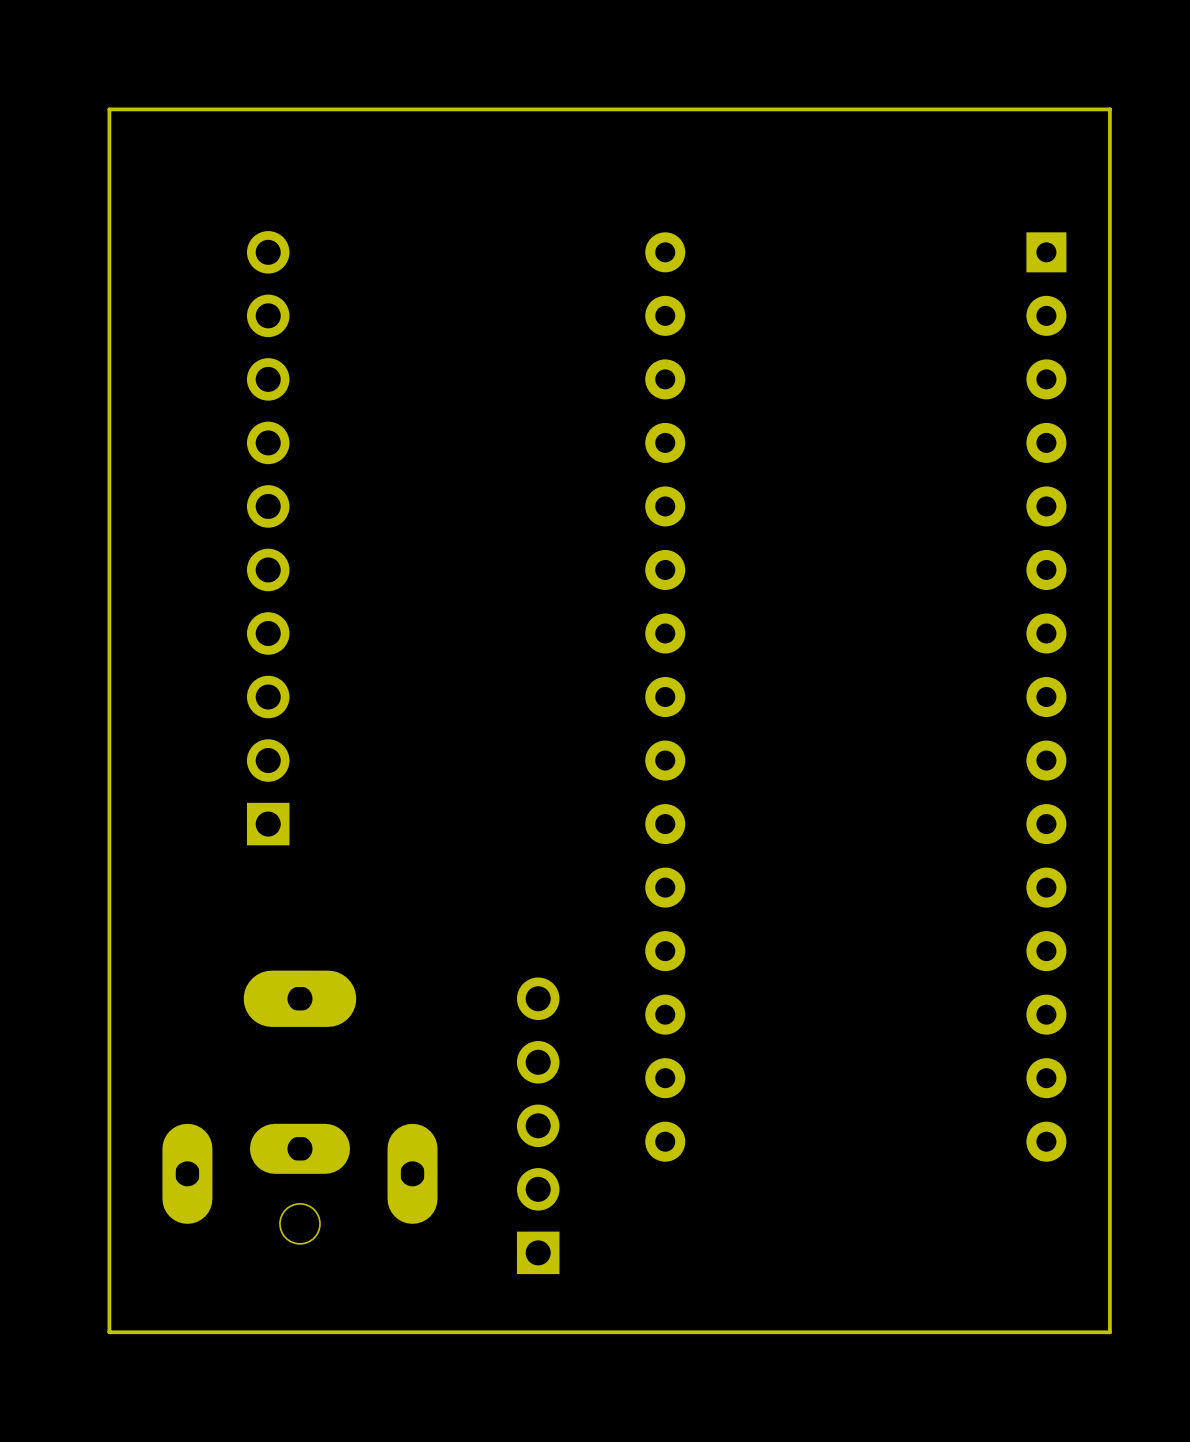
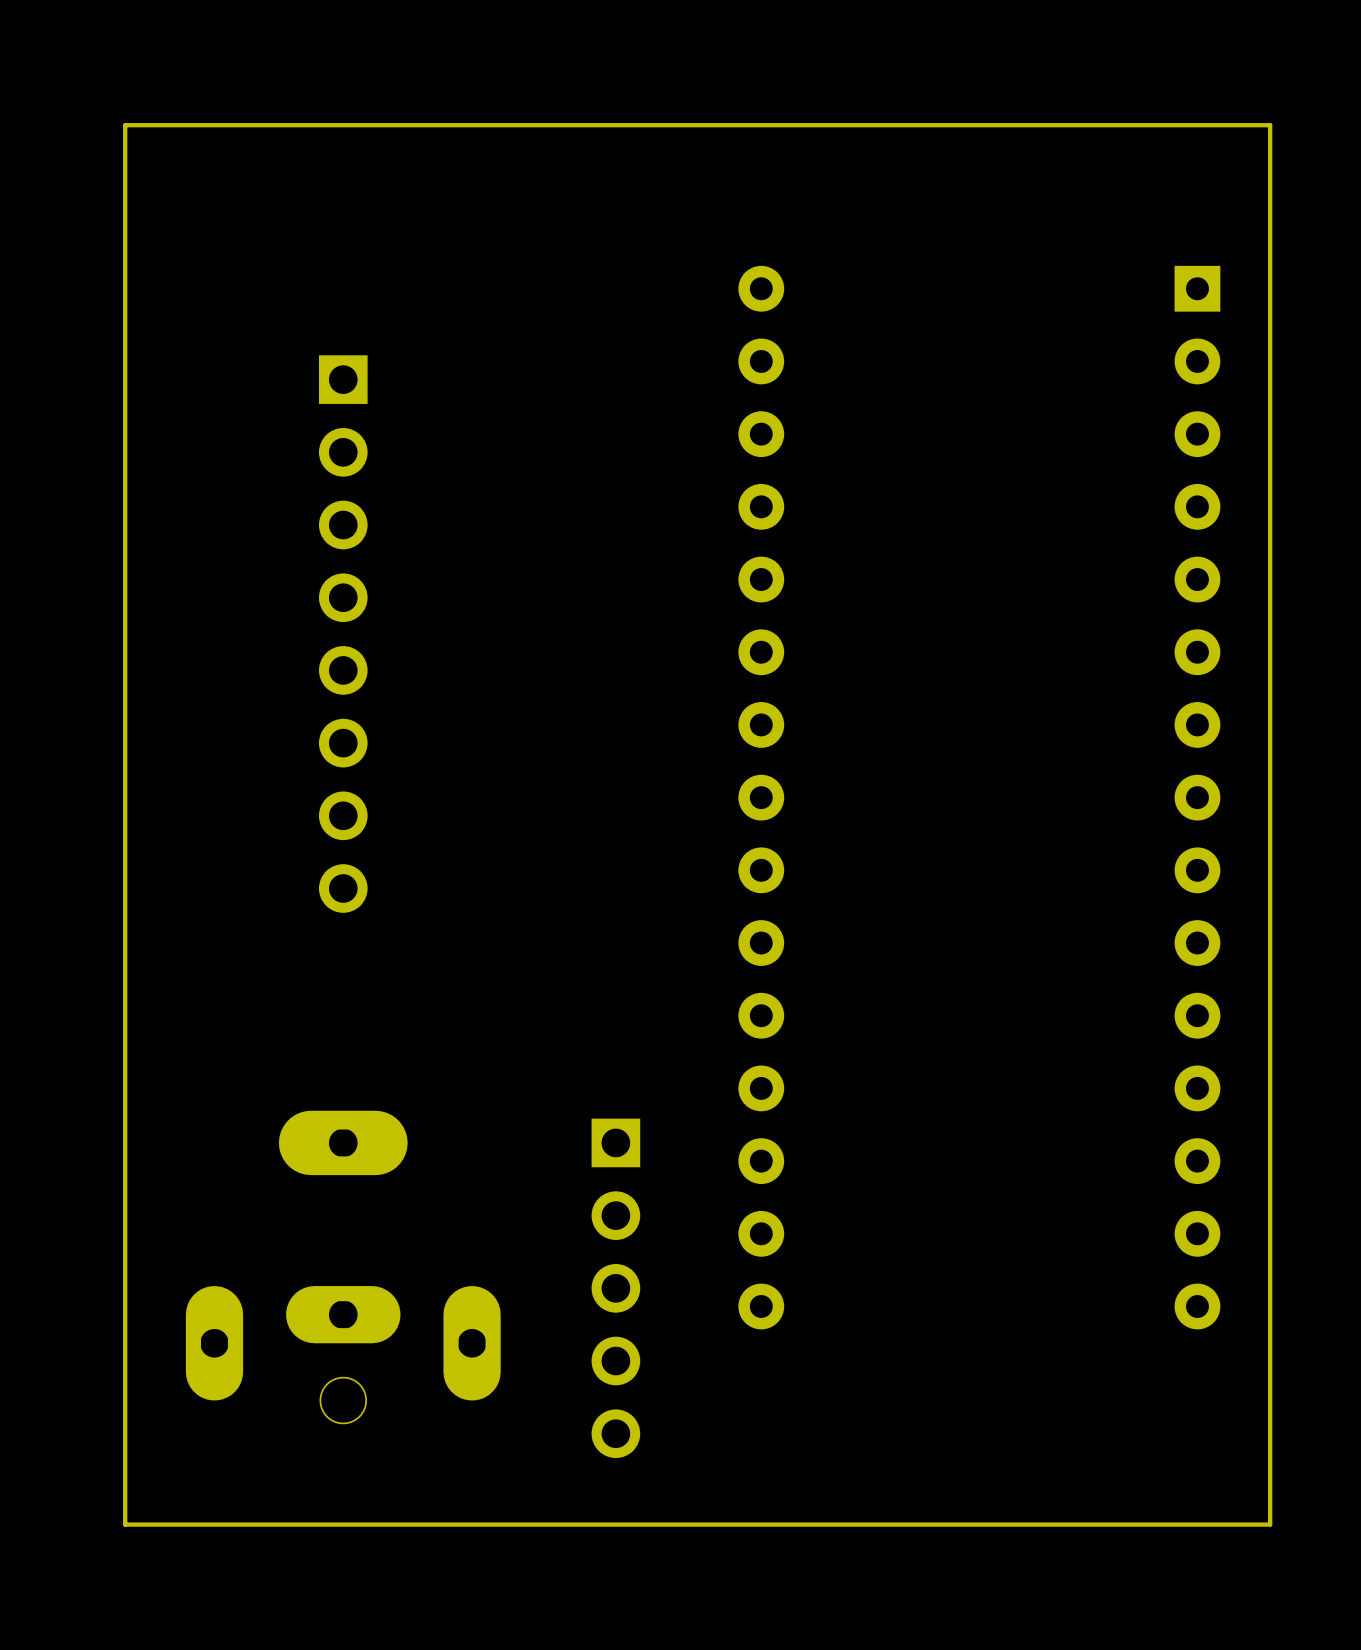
part: (268, 538) -> none
part: none -> (343, 634)
part rotation: 0° (538, 1125) -> 180° (615, 1288)

